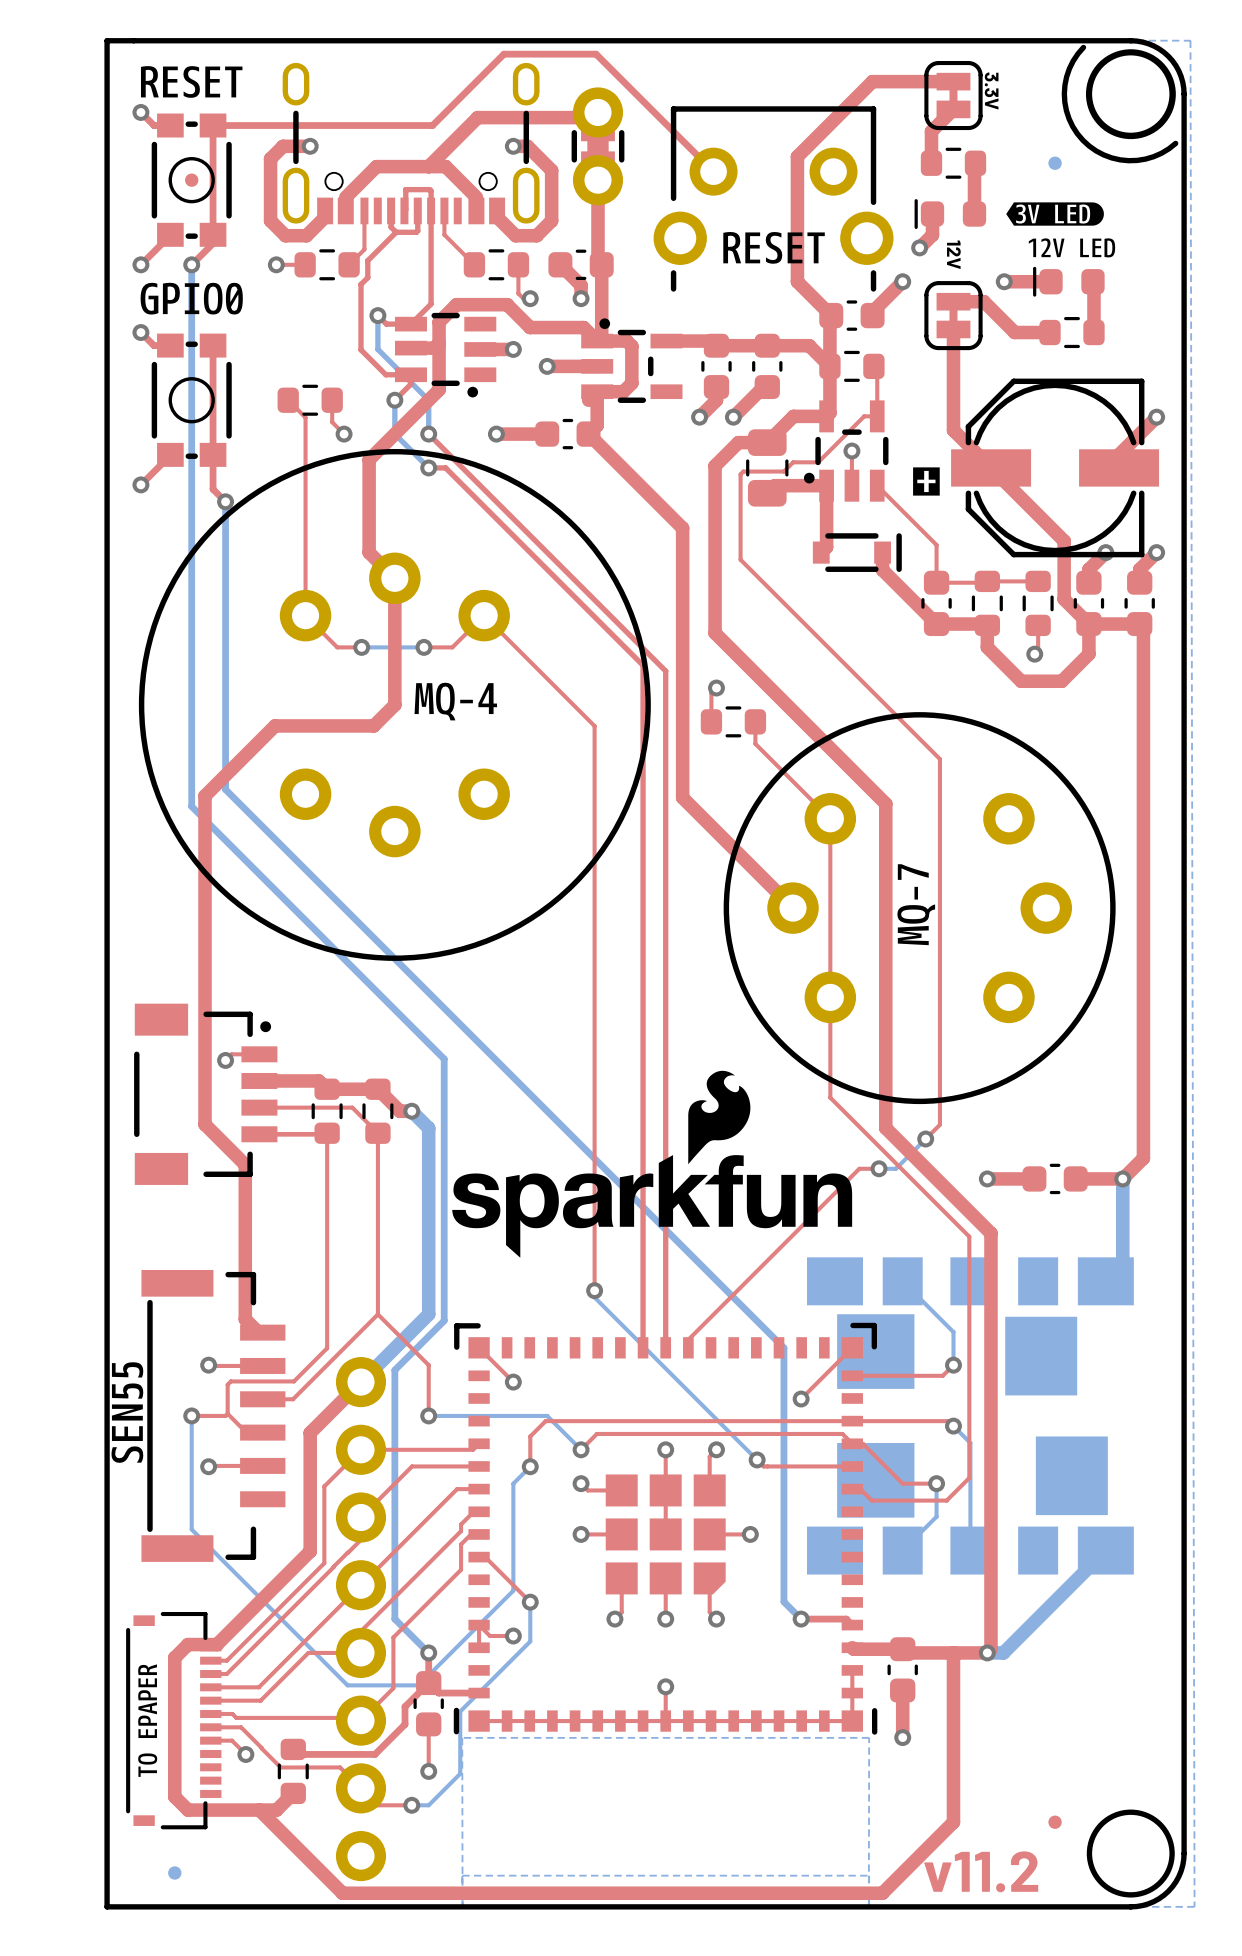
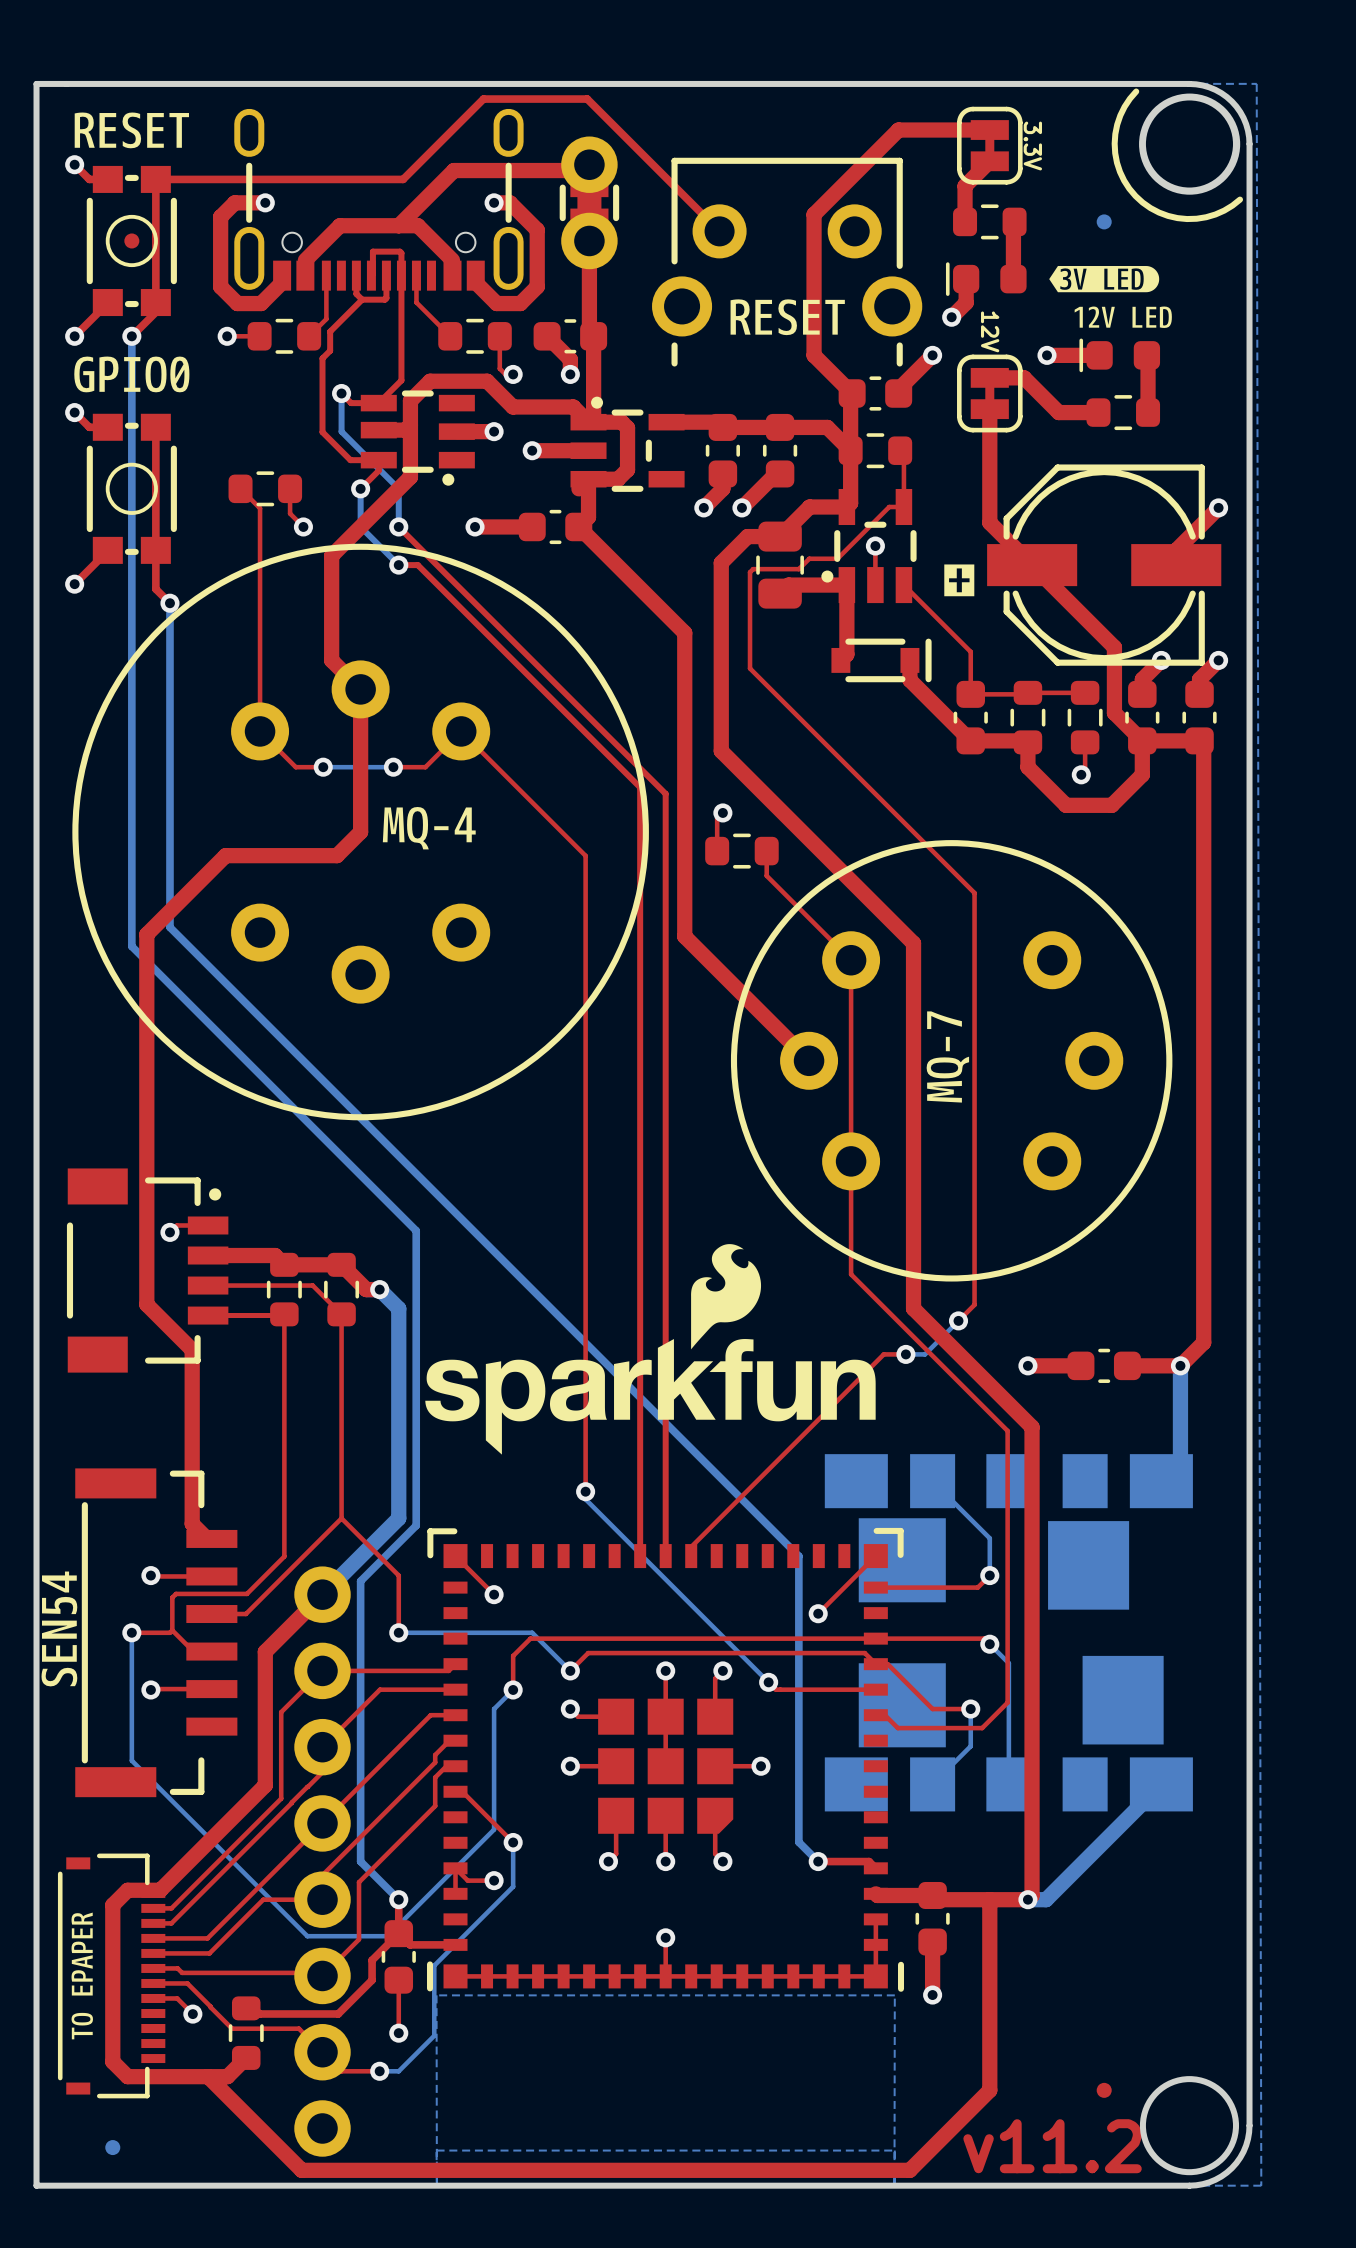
drawing shape: [111, 1362, 144, 1463] -> [41, 1571, 78, 1687]

